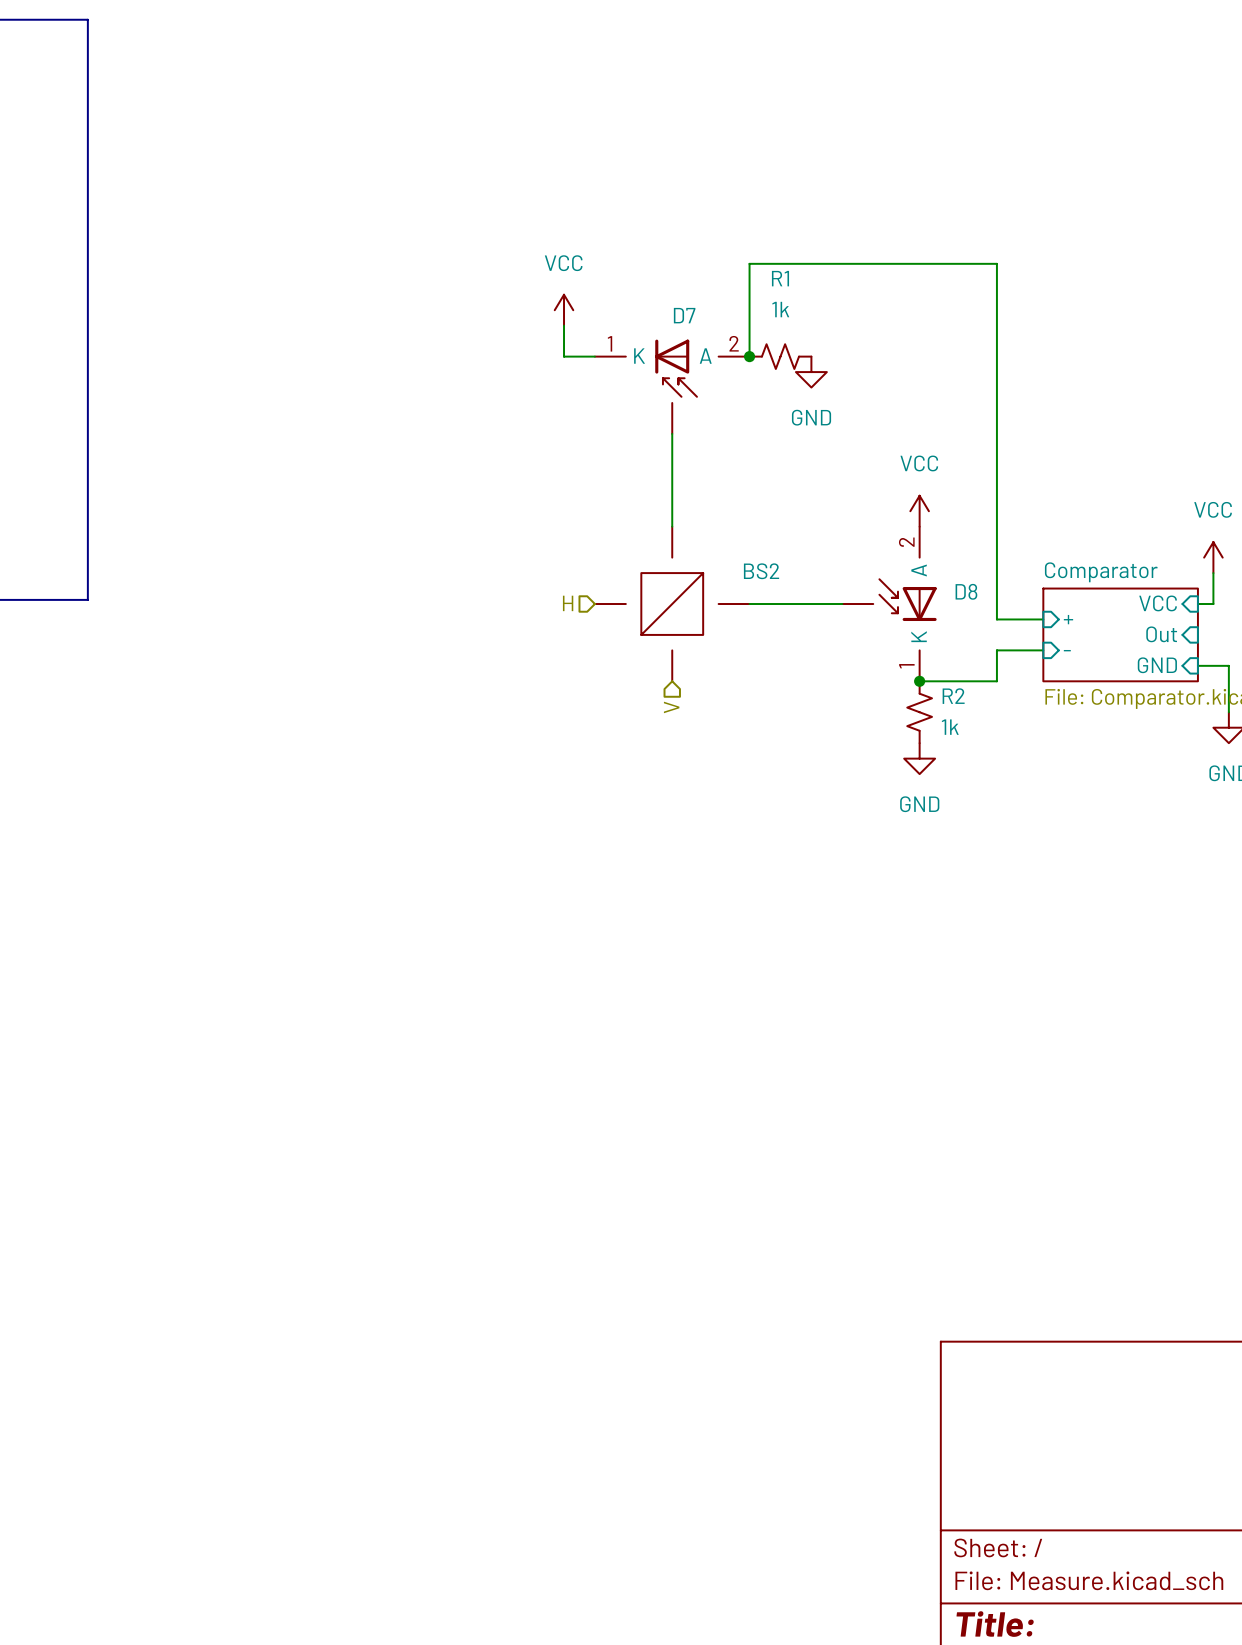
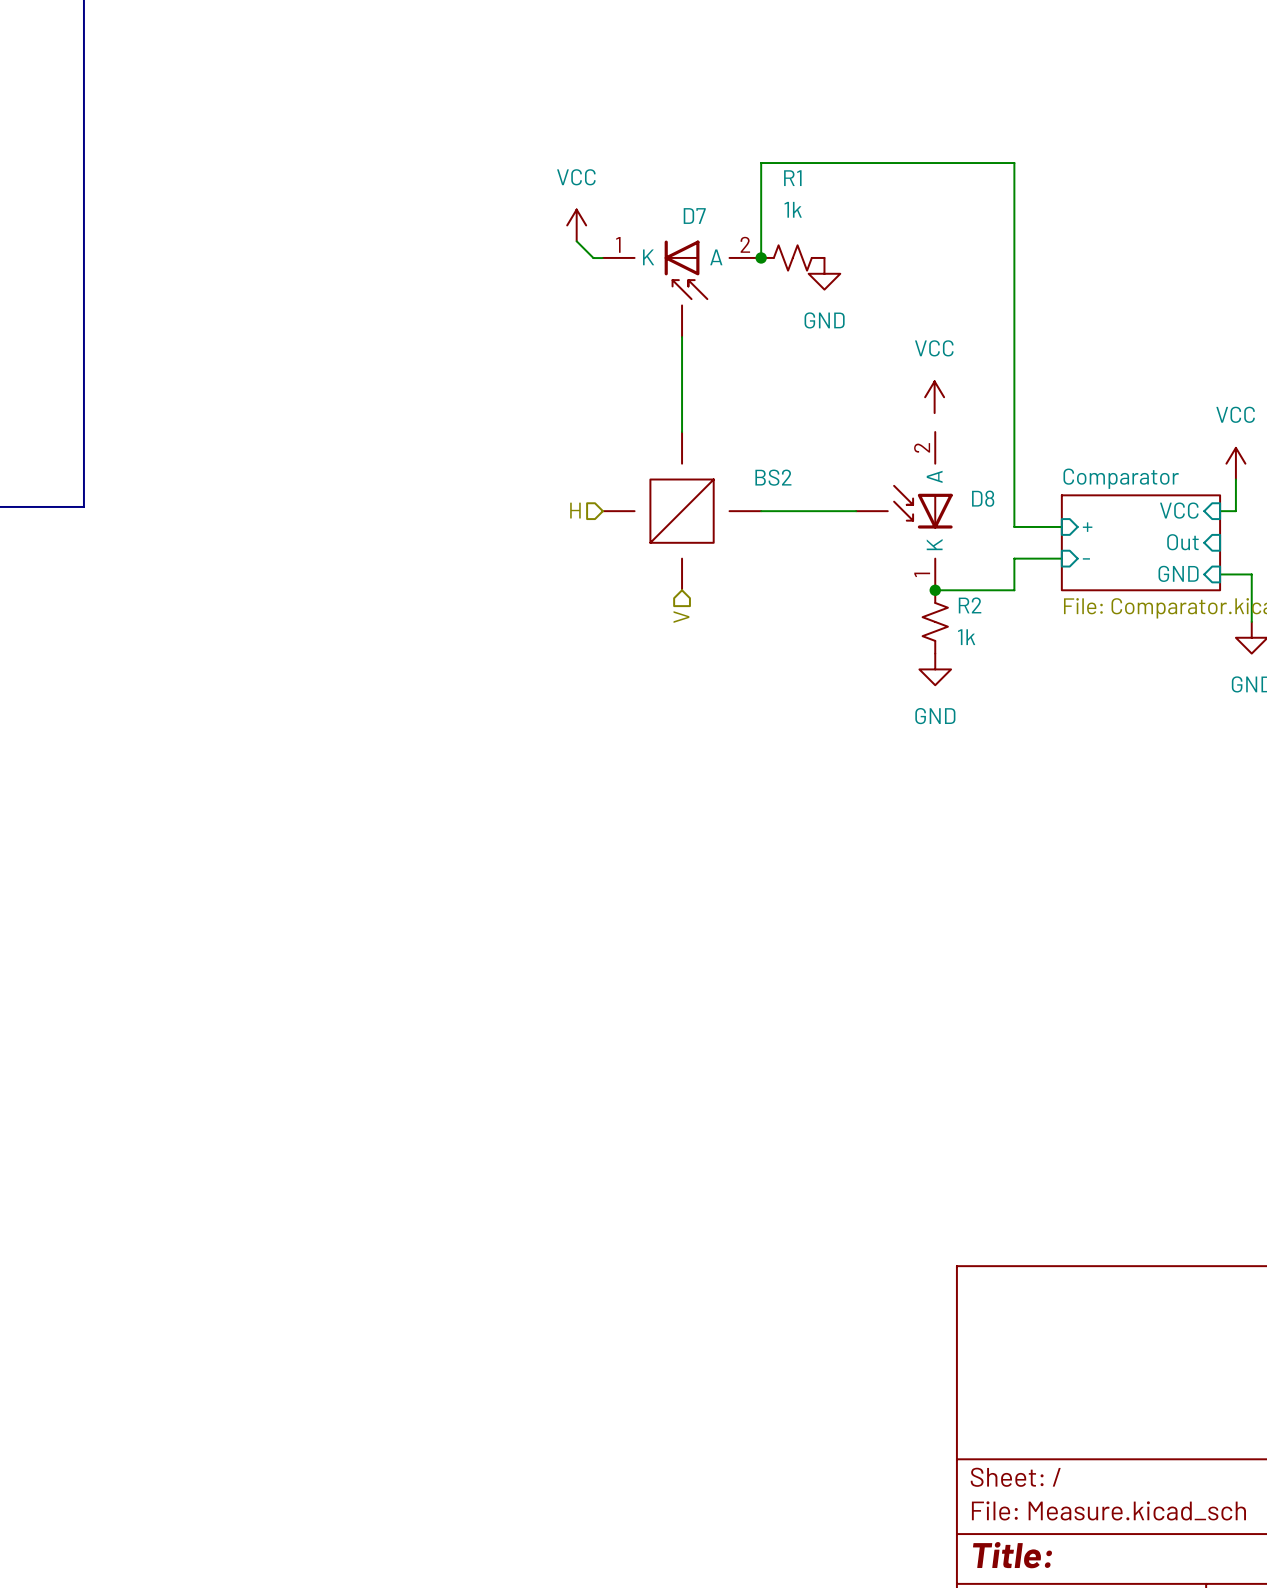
power symbol position: VCC (564, 310) -> VCC (576, 225)
wire: (564, 325) (564, 356) (594, 356) -> (576, 241) (593, 258) (602, 258)
power symbol position: VCC (919, 511) -> VCC (934, 397)

